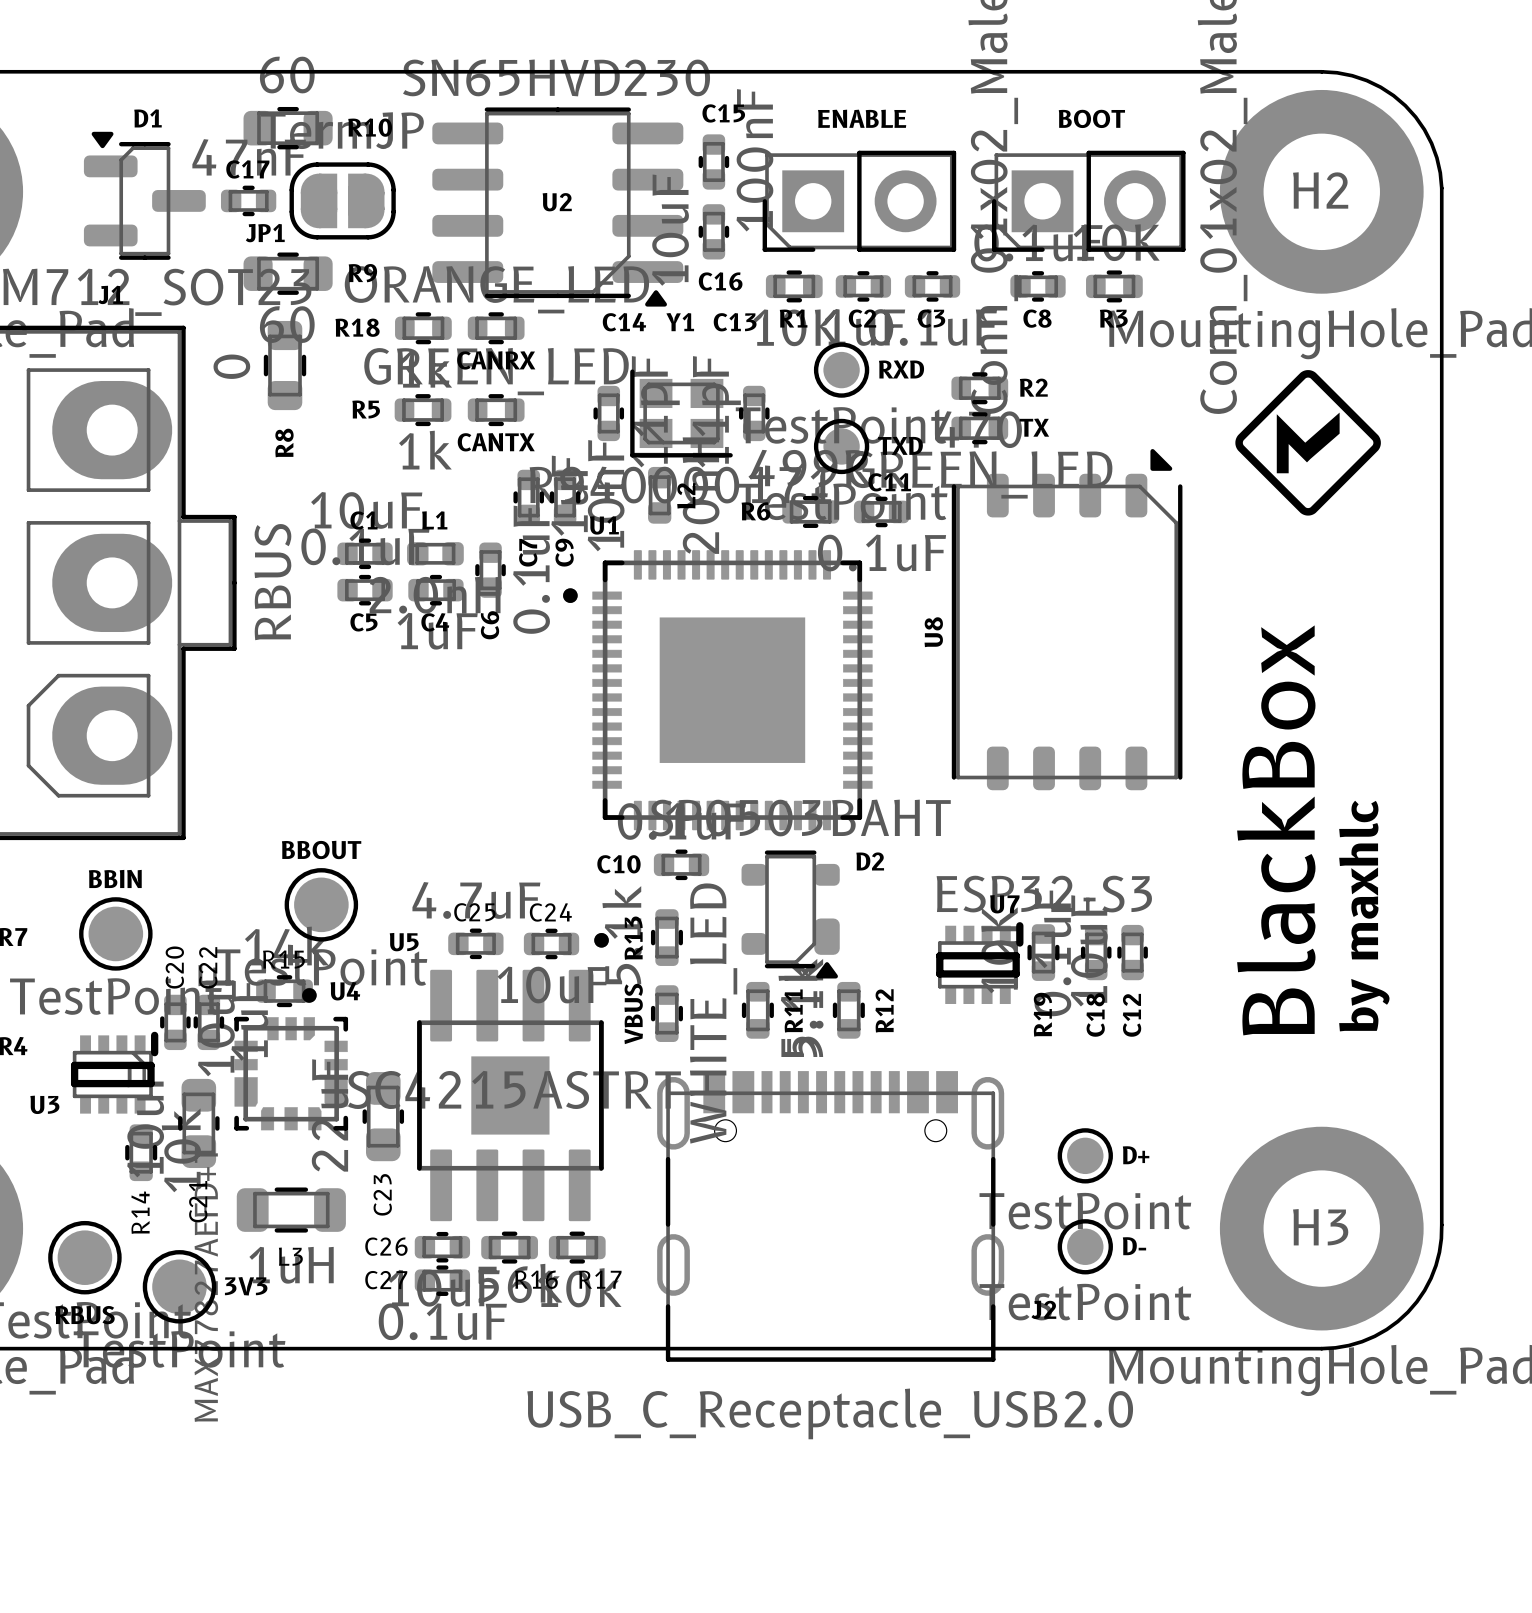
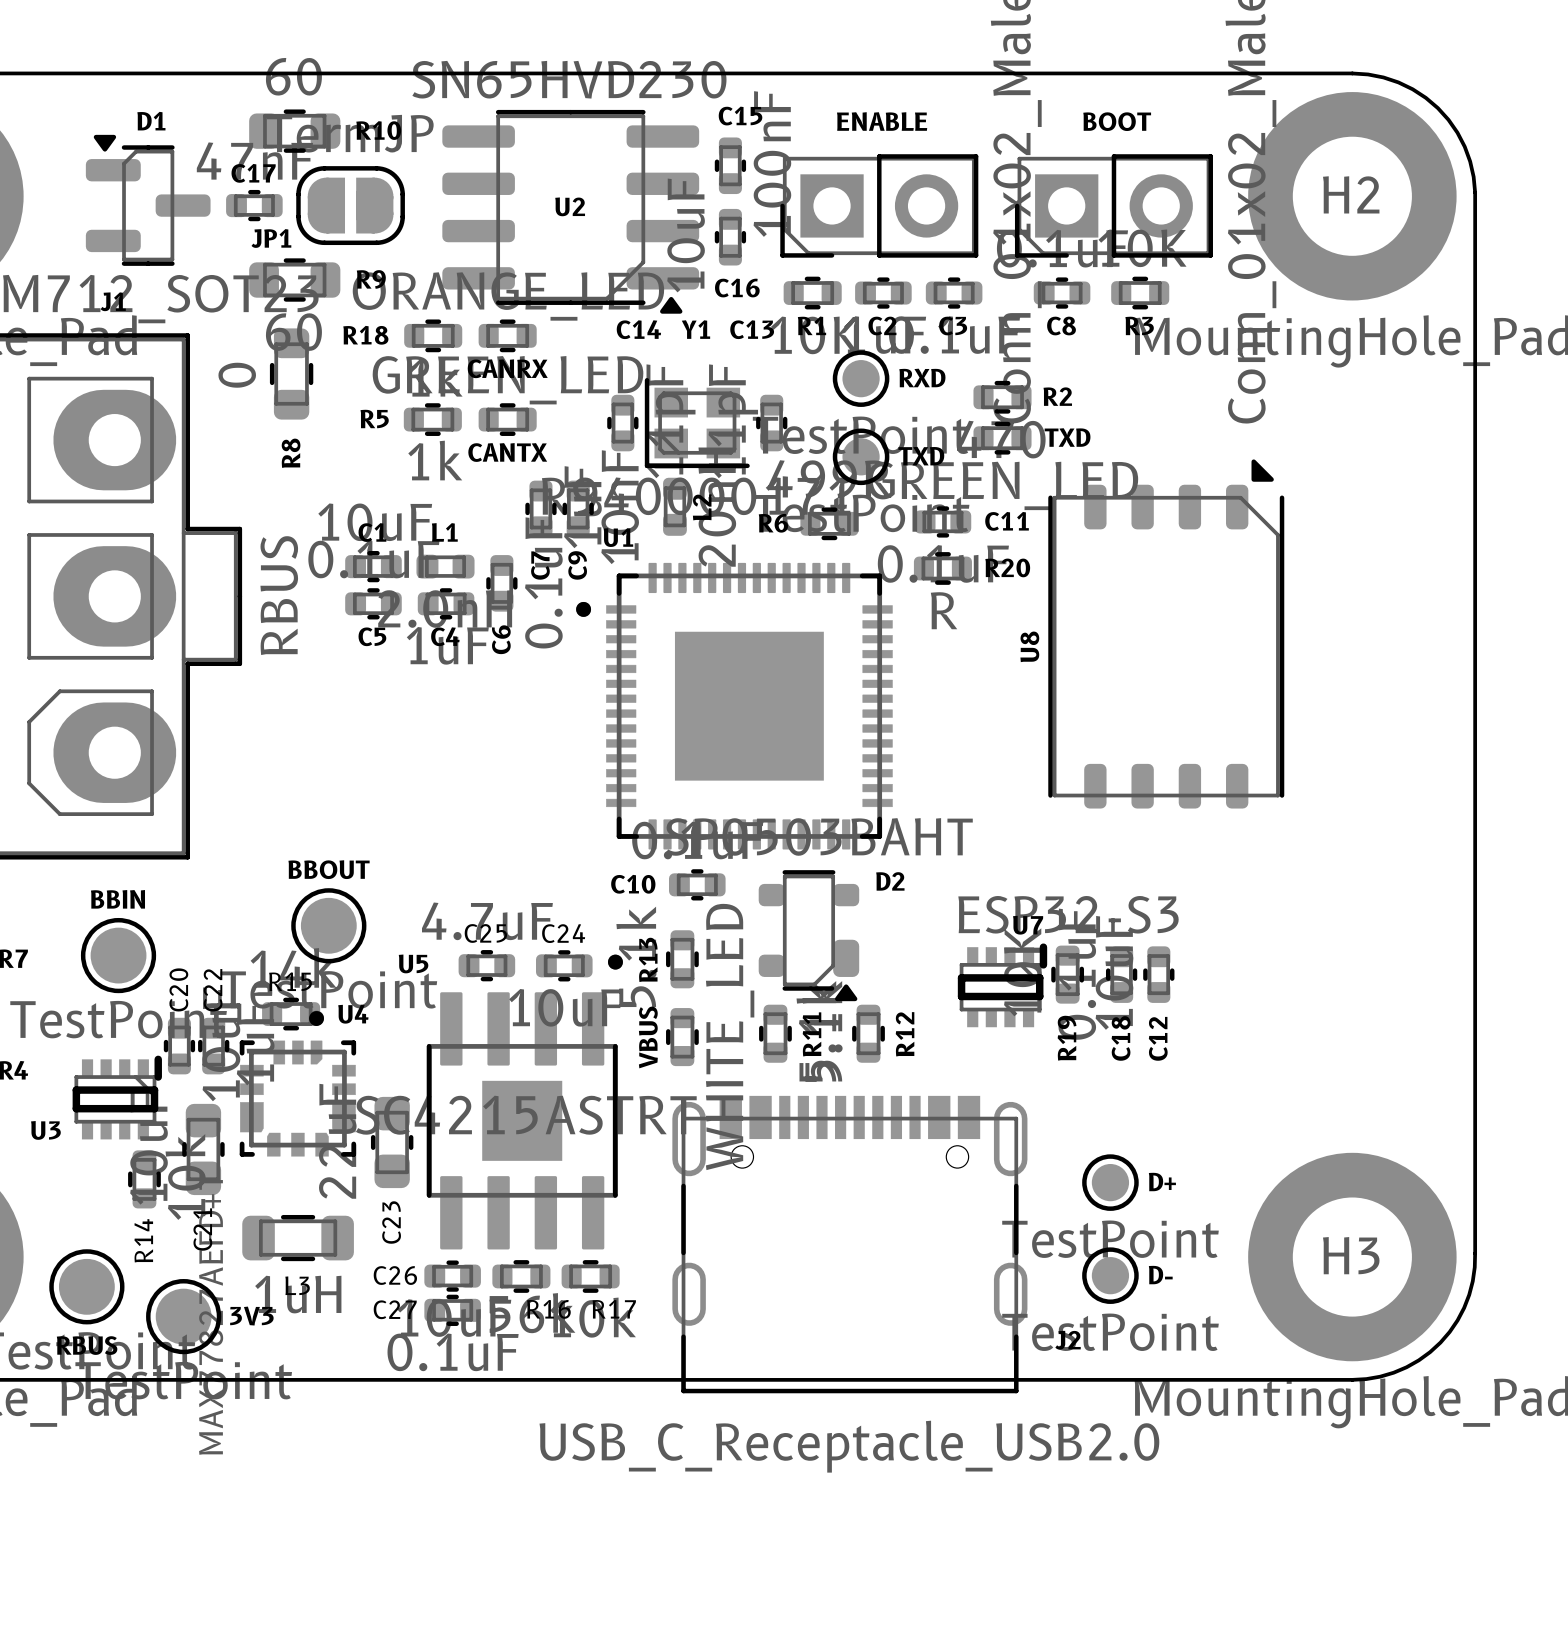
drawing: [1235, 370, 1381, 516] -> none
TX name: TX (1034, 427) -> TXD (1067, 437)
C11 name position: C11 (889, 482) -> C11 (1007, 521)
C11 position: (881, 511) -> (942, 521)
R20: none -> R (942, 568)
U8 position: (1067, 619) -> (1166, 633)
text: BlackBox (1276, 830) -> none
text: by maxhlc (1364, 916) -> none

